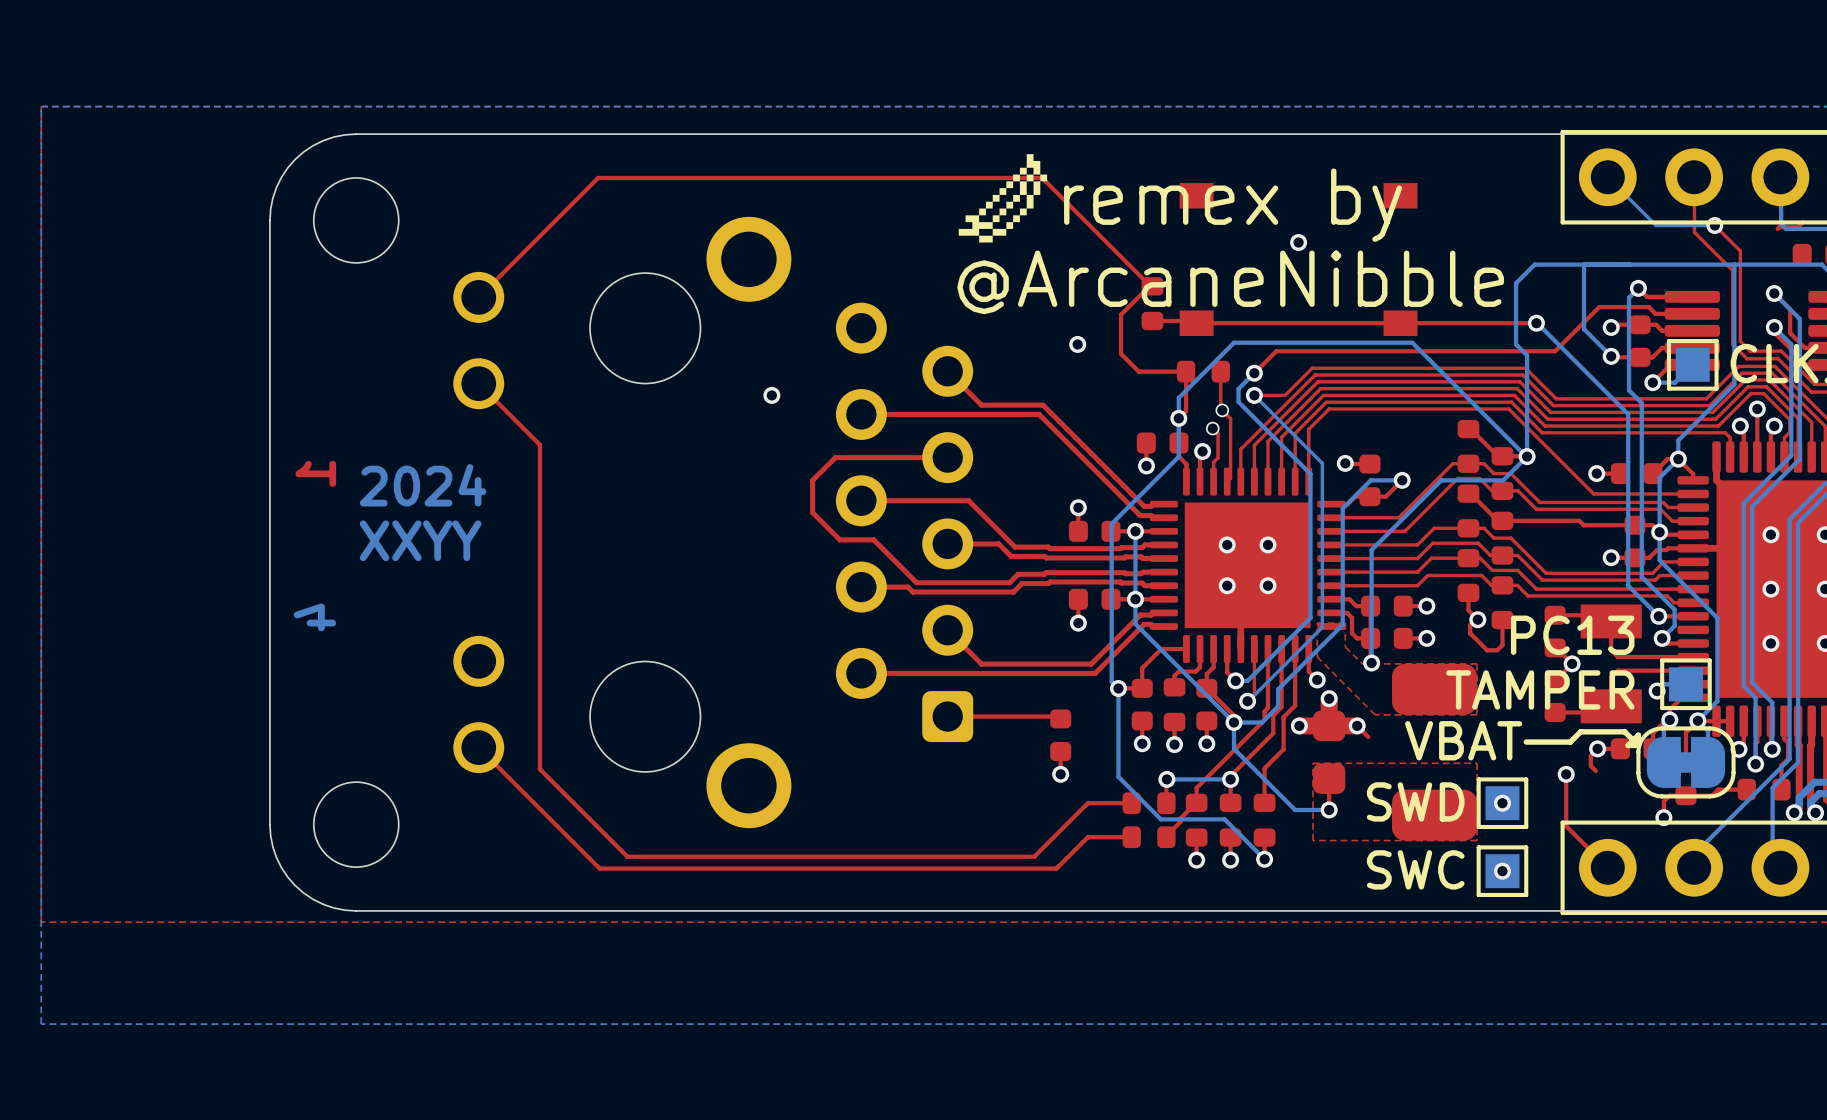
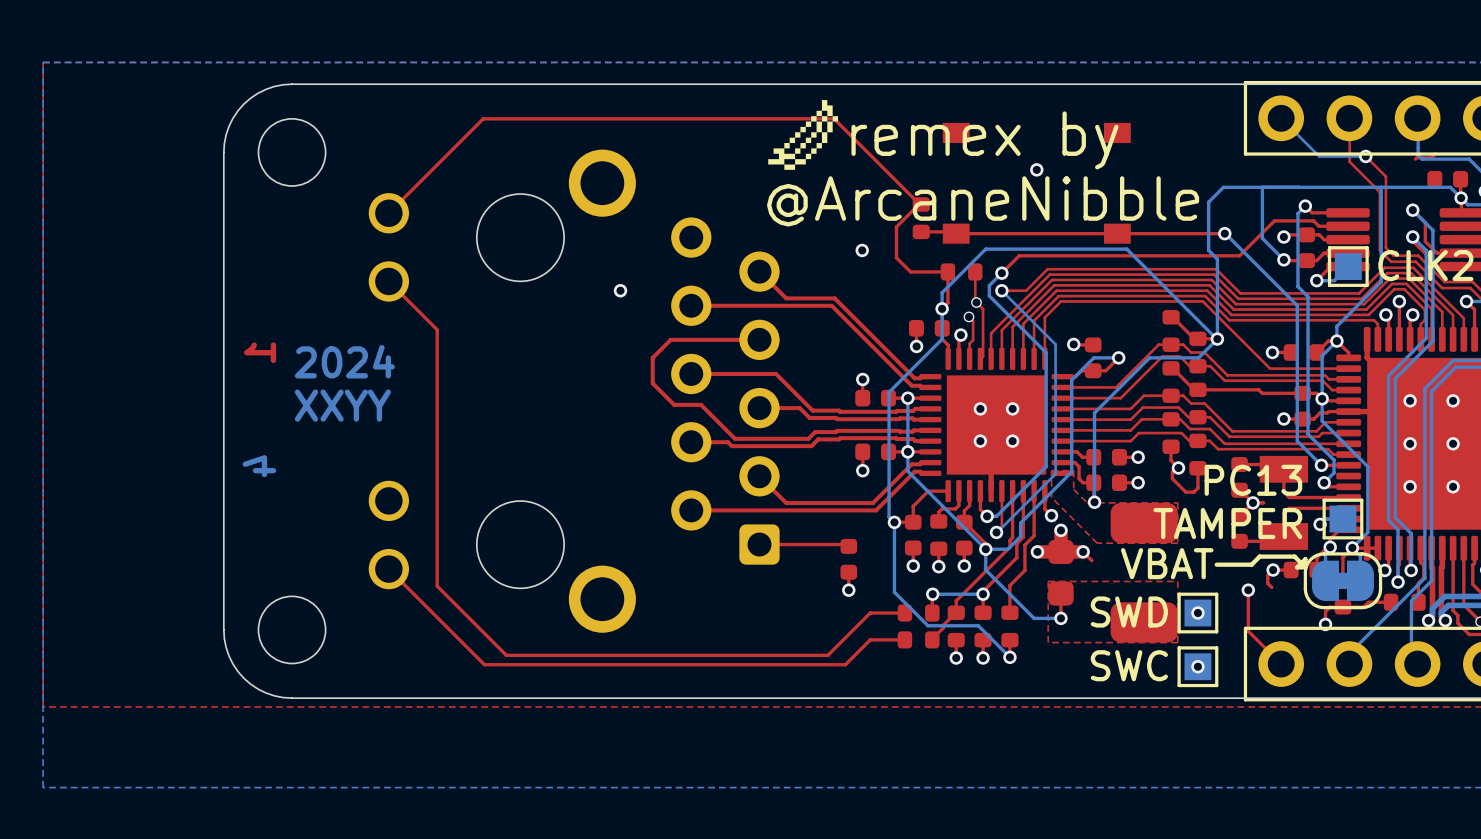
top track: none -> (1263, 502) (1252, 502)

